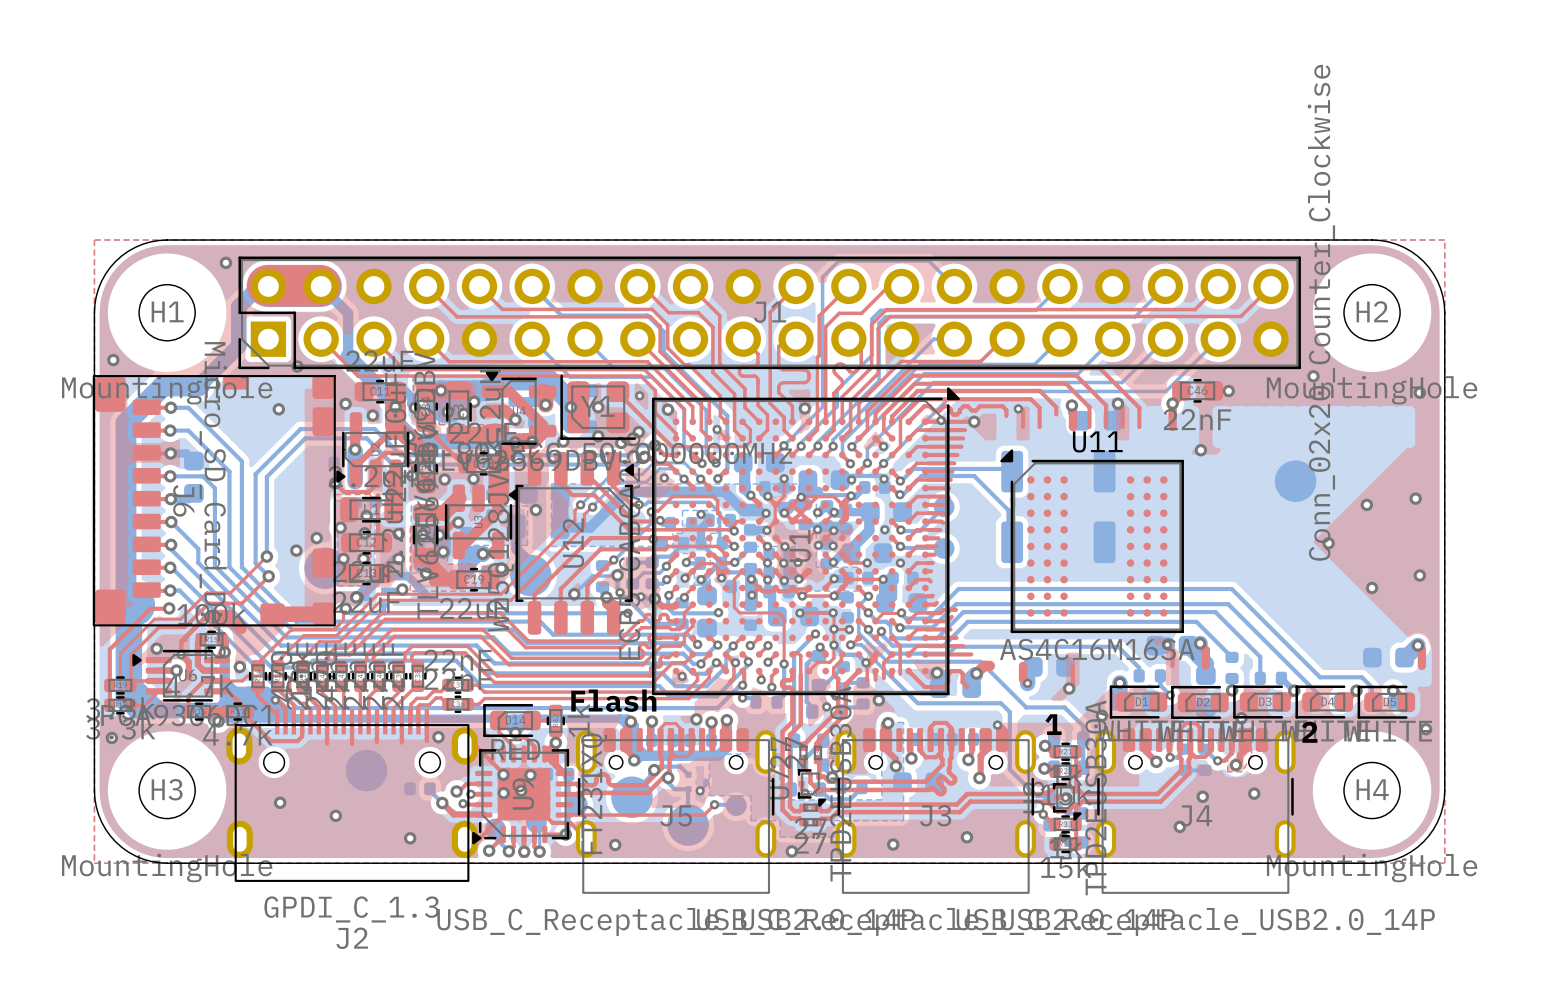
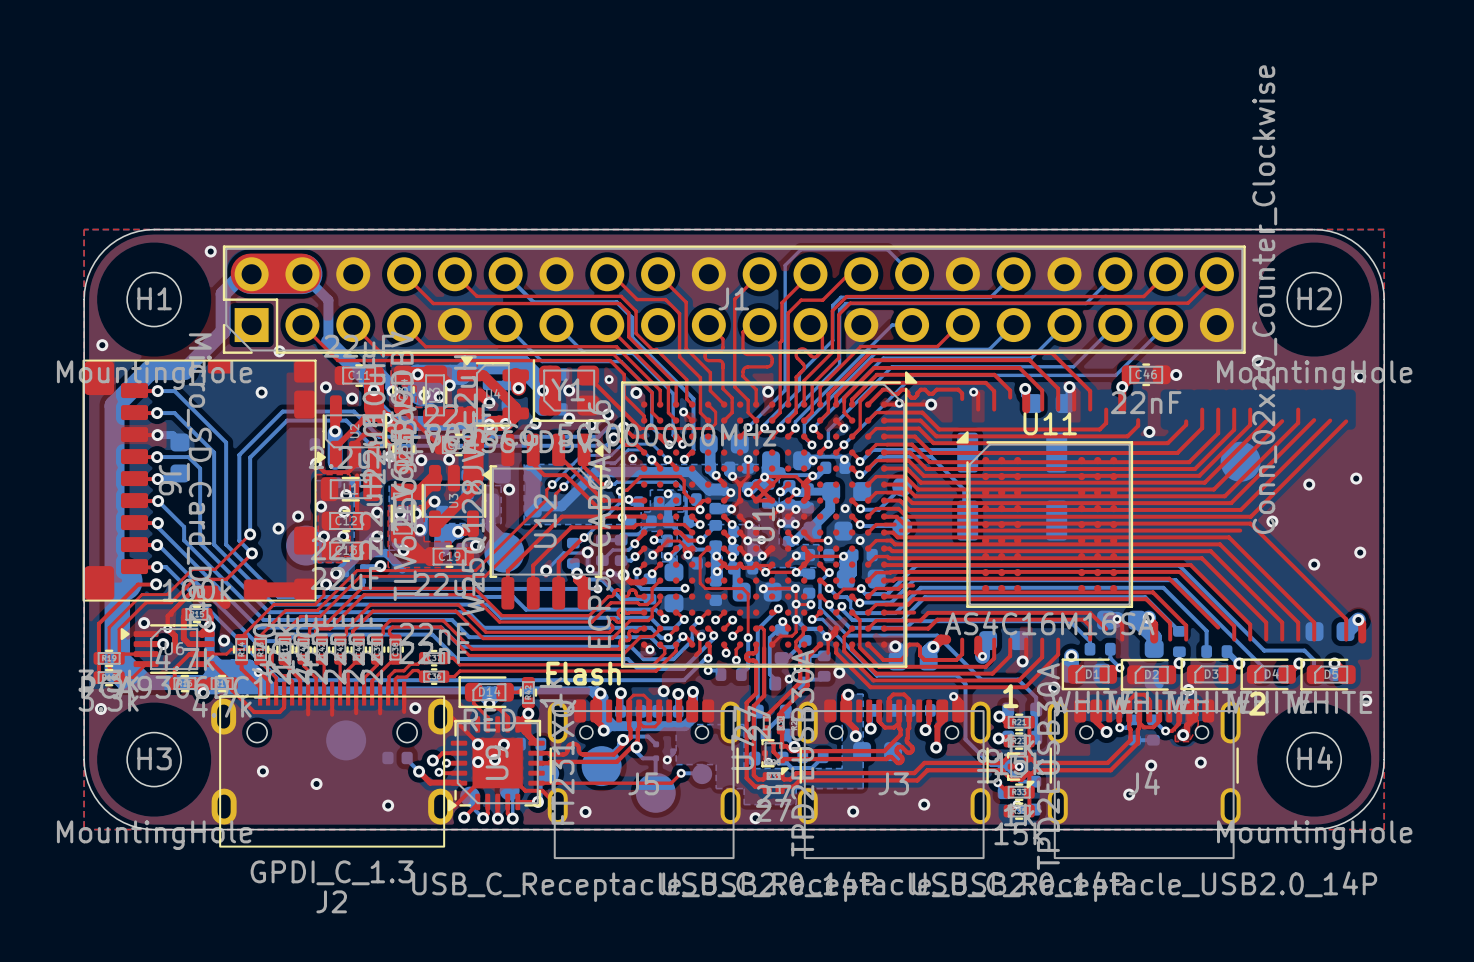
top track: none -> (1106, 409) (1106, 423) (1099, 429) (939, 429) (922, 412)
top track: none -> (1202, 409) (1202, 428) (1177, 452) (931, 452) (914, 436)
top track: none -> (1218, 409) (1218, 433) (1189, 462) (929, 462) (911, 444)
top track: none -> (1234, 409) (1234, 429) (1194, 469) (926, 469) (910, 452)
top track: none -> (1250, 409) (1250, 424) (1199, 475) (923, 475) (908, 460)
top track: none -> (1298, 409) (1298, 422) (1224, 496) (915, 496) (903, 484)
top track: none -> (1138, 420) (1138, 425) (1127, 436) (936, 436) (920, 420)
top track: none -> (1314, 420) (1231, 503) (912, 503) (901, 492)
top track: none -> (1330, 420) (1240, 509) (909, 509) (899, 500)
top track: none -> (1186, 421) (1186, 424) (1167, 443) (933, 443) (918, 428)
top track: none -> (1266, 421) (1204, 482) (920, 482) (906, 468)
top track: none -> (1282, 421) (1213, 489) (918, 489) (906, 477)
top track: none -> (1346, 421) (1250, 516) (906, 516) (898, 508)
top track: none -> (896, 516) (903, 523) (1250, 523) (1346, 619) (1346, 639)
top track: none -> (900, 530) (1240, 530)
top track: none -> (892, 532) (897, 537) (1229, 537) (1314, 622) (1314, 639)
top track: none -> (891, 540) (895, 544) (1220, 544) (1298, 622) (1298, 639)
top track: none -> (889, 548) (892, 551) (1210, 551) (1282, 622) (1282, 639)
top track: none -> (889, 558) (1201, 558) (1266, 622) (1266, 639)
top track: none -> (884, 565) (1190, 565) (1250, 624) (1250, 639)
top track: none -> (891, 571) (1179, 571) (1234, 626) (1234, 639)
top track: none -> (895, 578) (1169, 578) (1218, 627)
top track: none -> (909, 592) (1153, 592) (1186, 625) (1186, 639)
top track: none -> (908, 604) (913, 599) (1146, 599) (1170, 623) (1170, 639)
top track: none -> (920, 620) (928, 612) (1089, 612) (1106, 629)
top track: none -> (928, 628) (937, 619) (1083, 619) (1090, 626) (1090, 639)
top track: none -> (962, 639) (962, 654) (956, 659) (924, 659)
top track: none -> (994, 639) (994, 658) (985, 666) (879, 666) (859, 647)
top track: none -> (1010, 639) (1010, 655) (992, 673) (876, 673) (852, 649)
top track: none -> (1042, 639) (1042, 657) (1018, 680) (873, 680) (844, 651)
top track: none -> (1058, 639) (1058, 654) (1025, 687) (870, 687) (836, 652)

